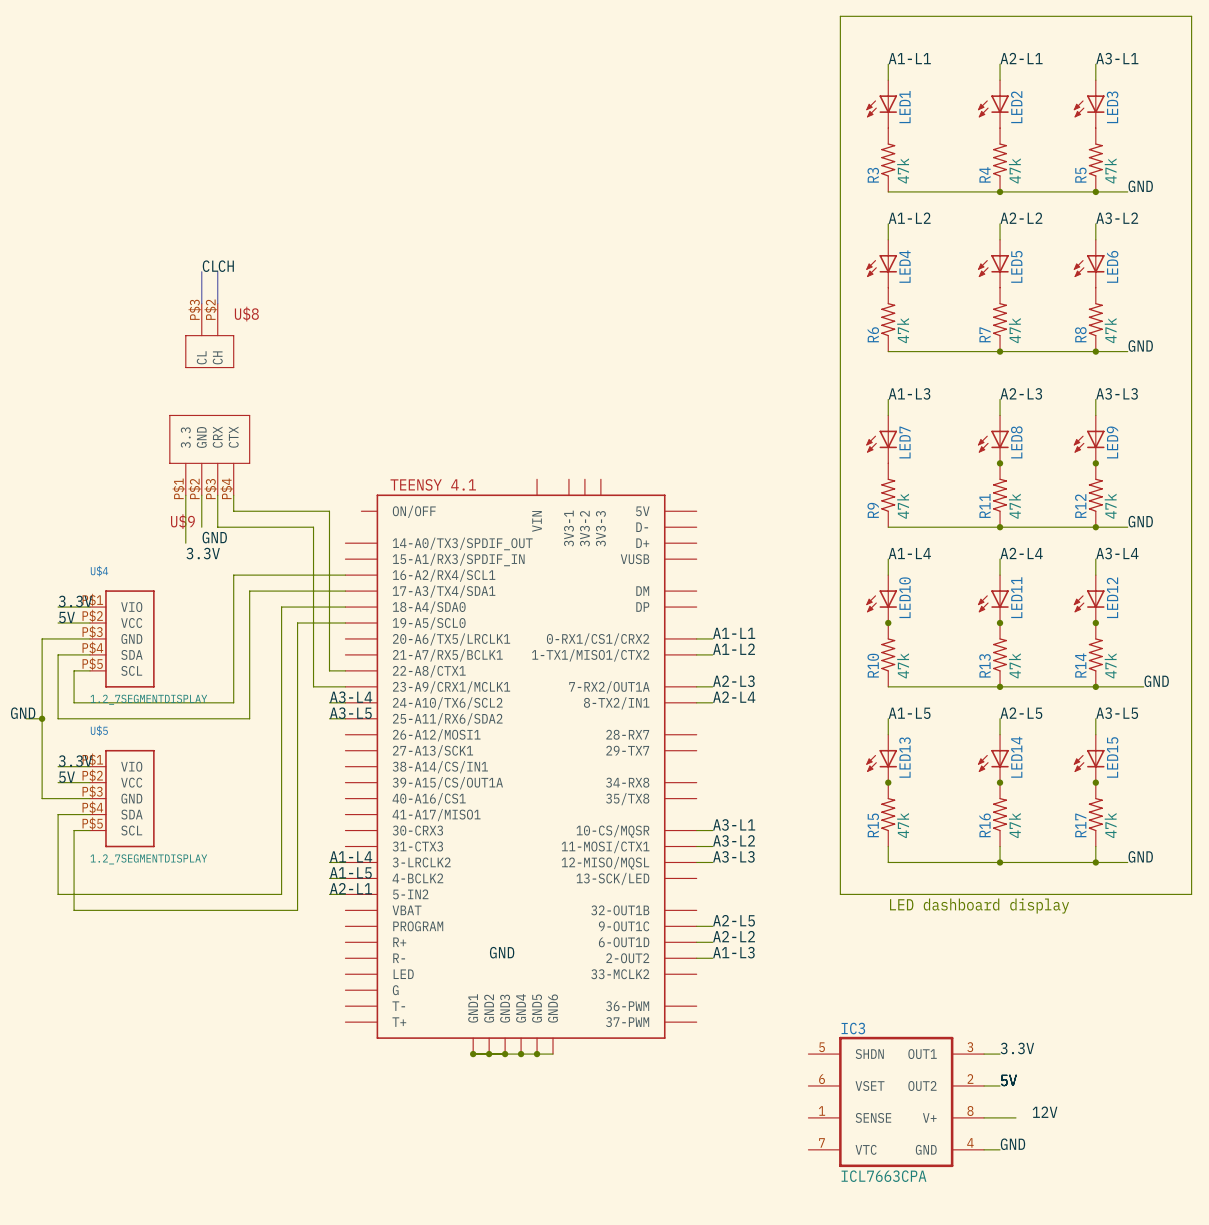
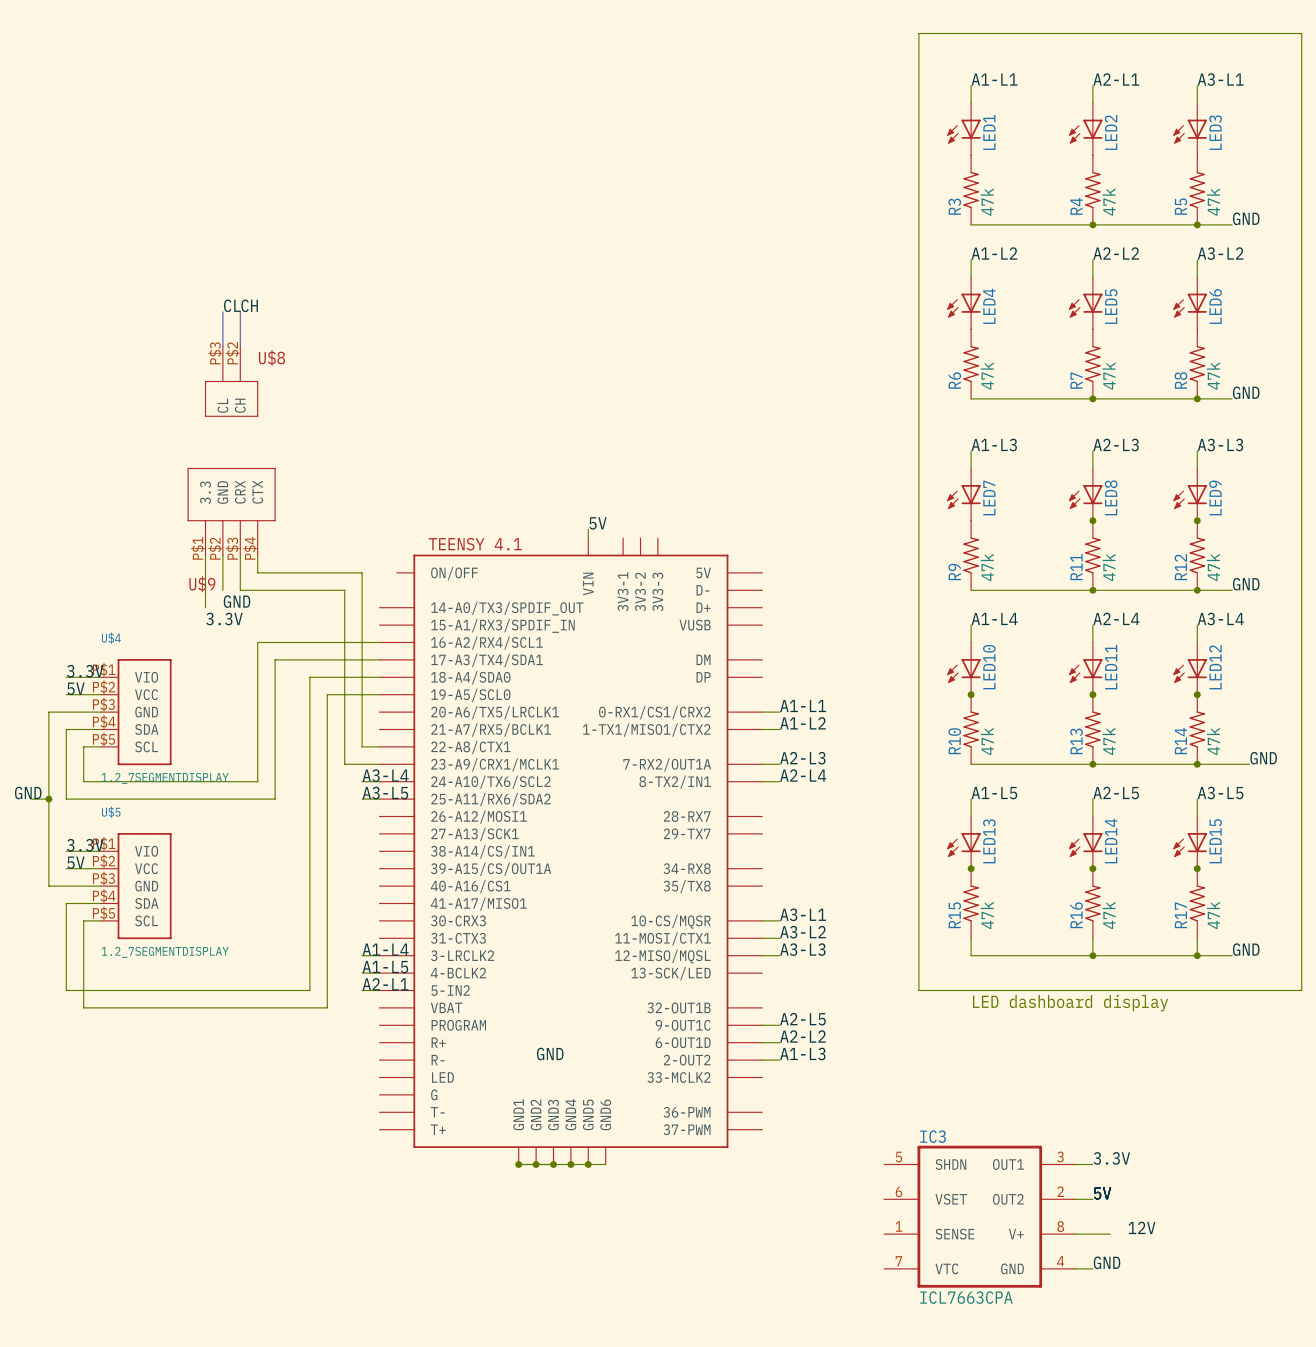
label: none -> 5V (598, 523)
wire: none -> (588, 529) (588, 538)

